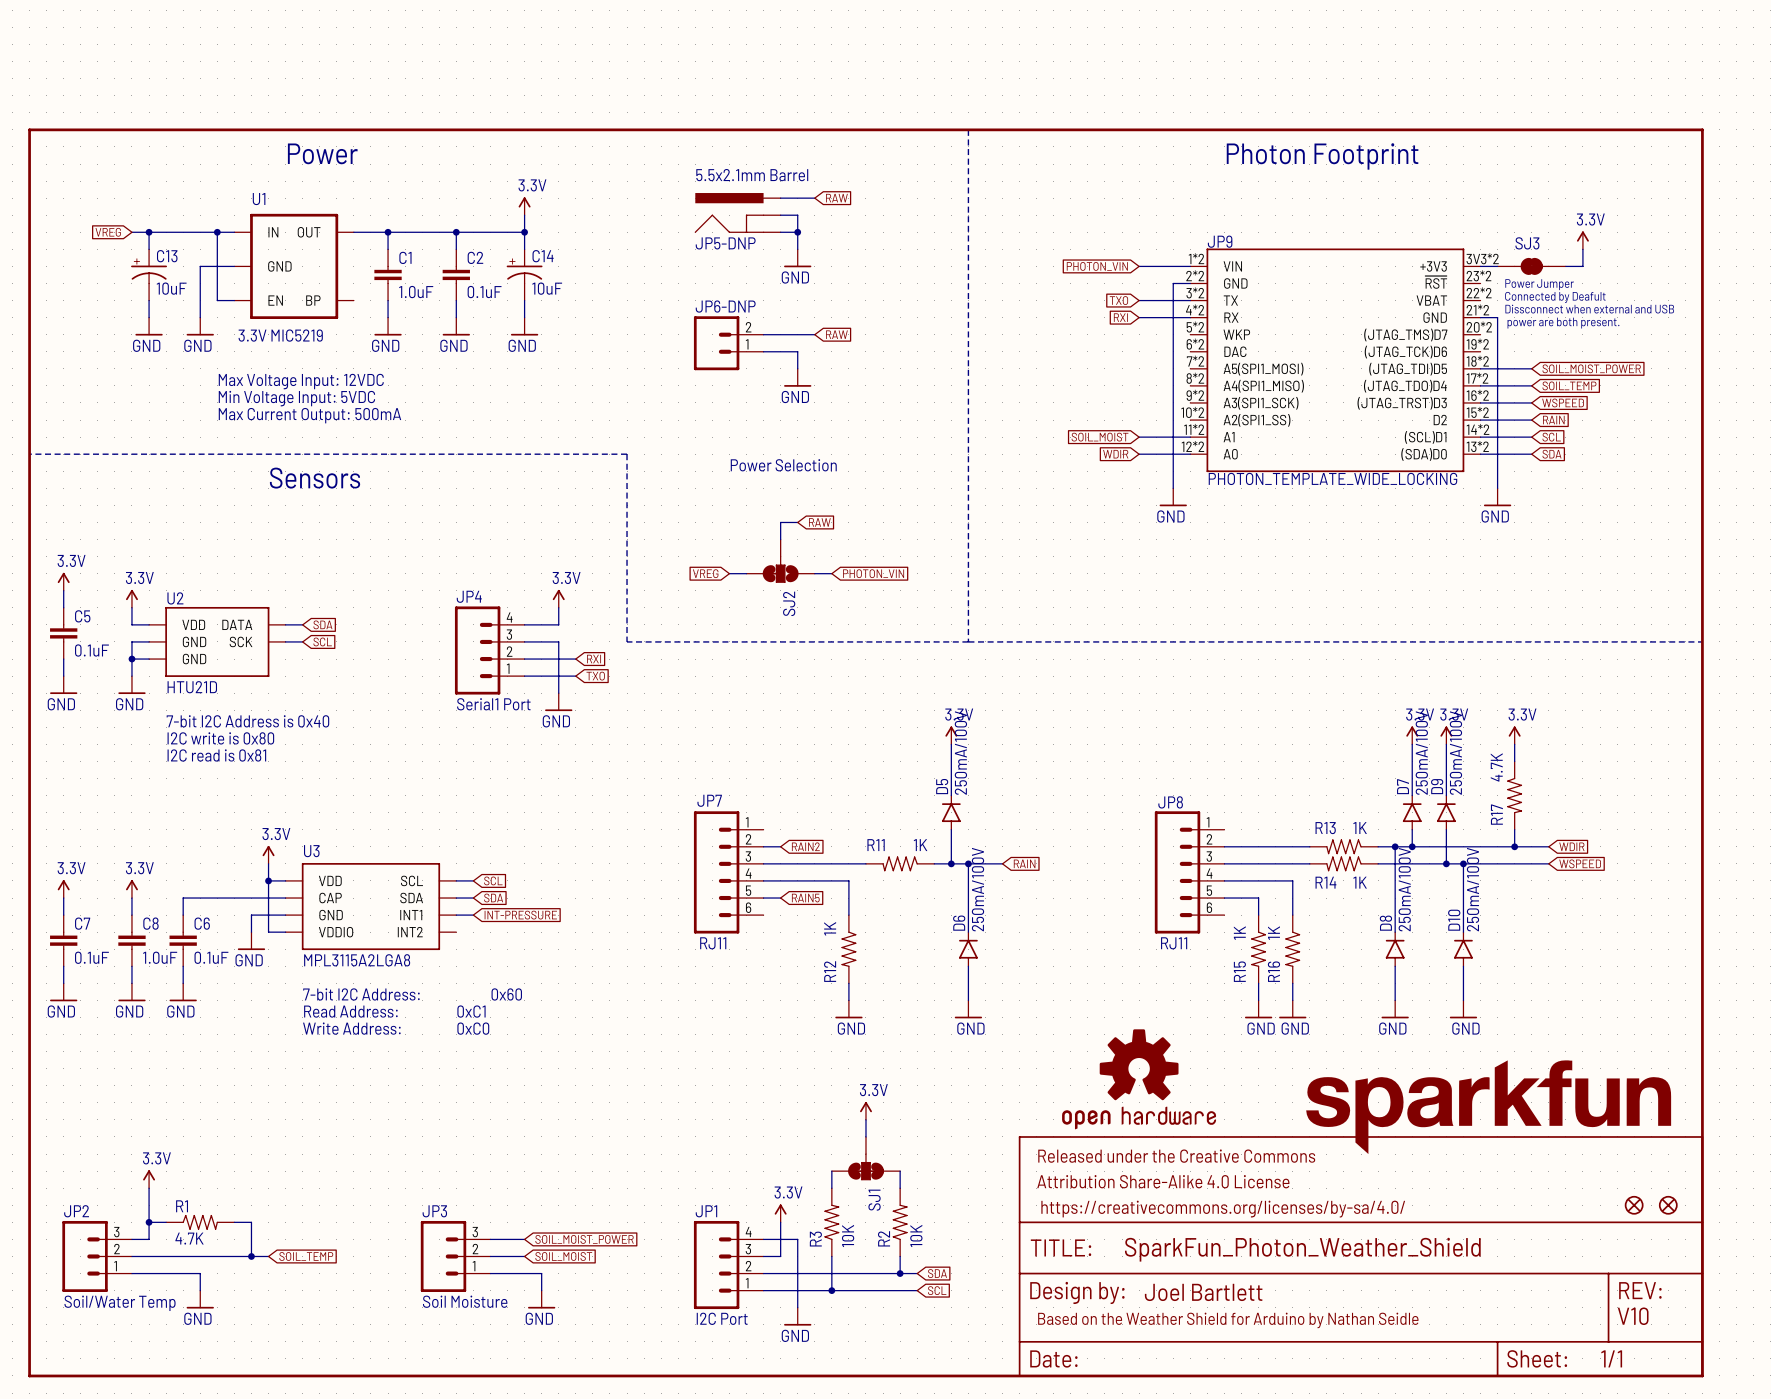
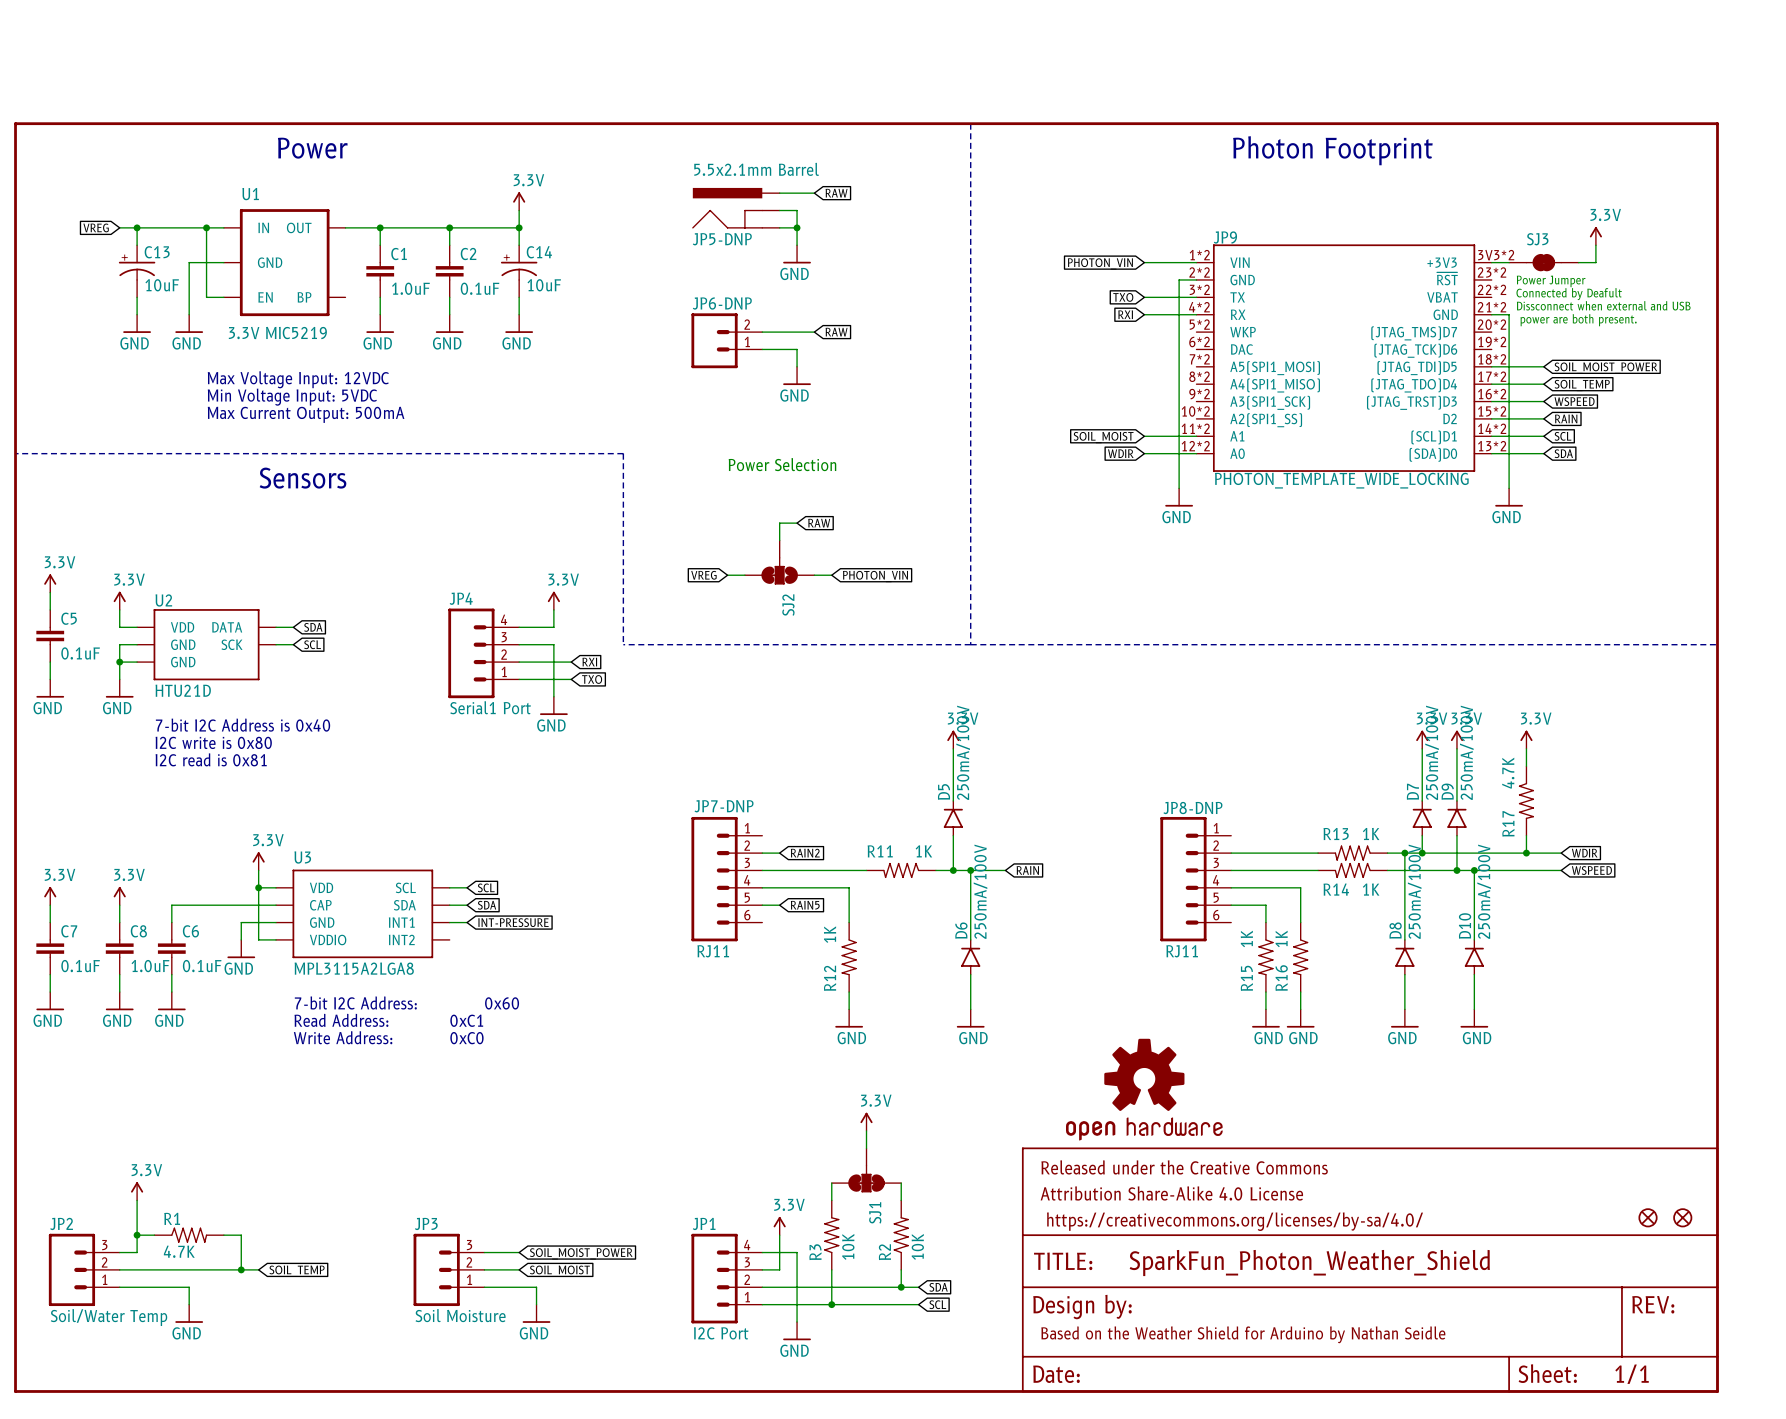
JP7 name: JP7 (709, 800) -> JP7-DNP (724, 806)
JP8 name: JP8 (1170, 802) -> JP8-DNP (1192, 808)
part: (1488, 1107) -> none
text: Joel Bartlett (1203, 1292) -> none
text: V10 (1633, 1316) -> none

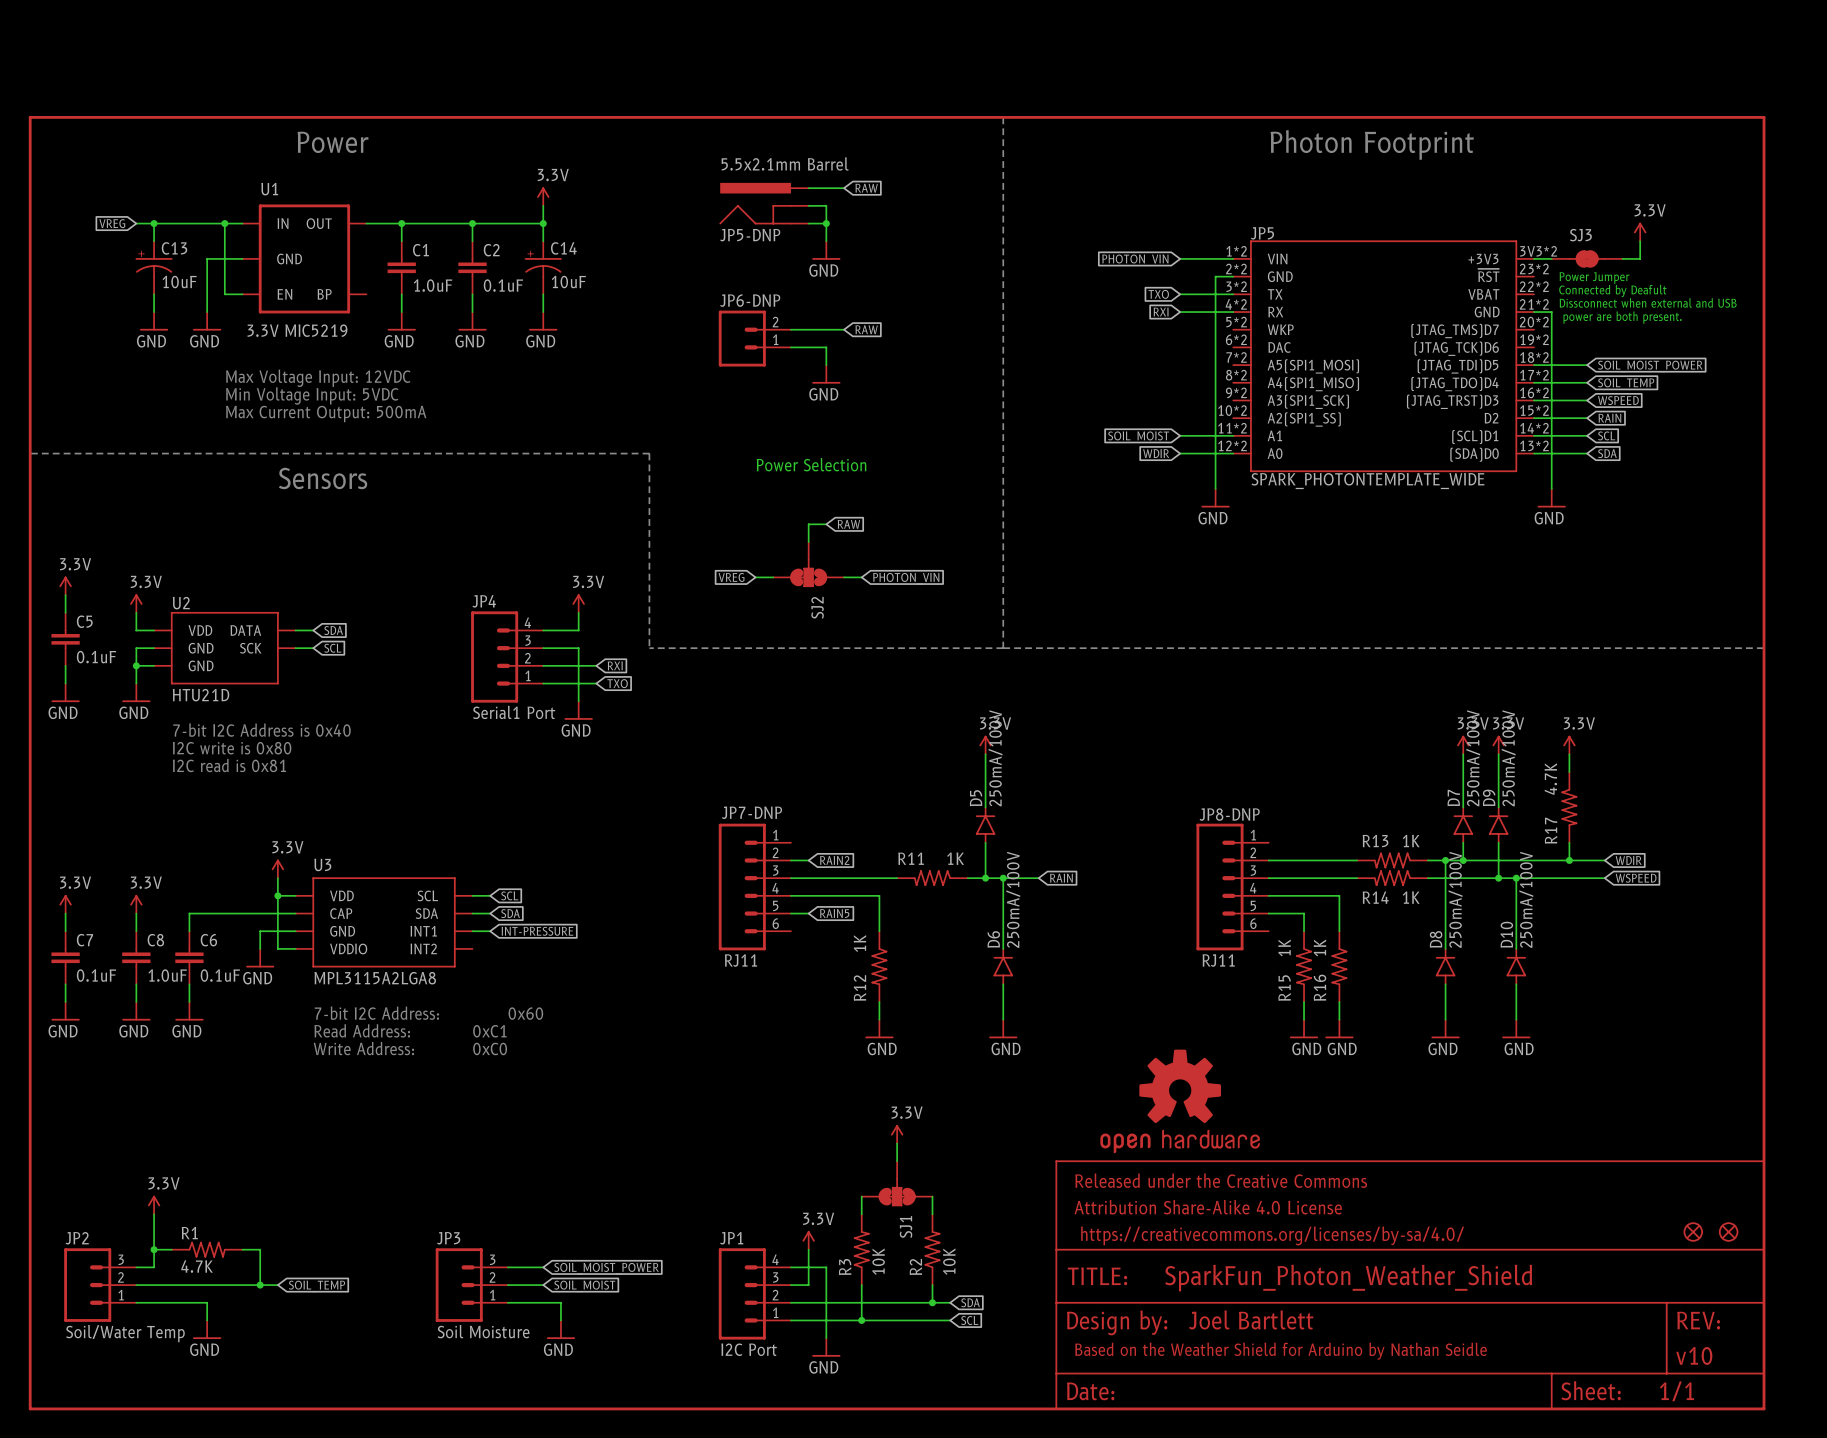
JP9 name: JP9 (1225, 237) -> JP5 (1262, 233)
JP9 value: PHOTON_TEMPLATE_WIDE_LOCKING (1341, 480) -> SPARK_PHOTONTEMPLATE_WIDE (1368, 481)
part text: none -> Joel Bartlett (1251, 1319)
part text: none -> v10 (1694, 1355)

